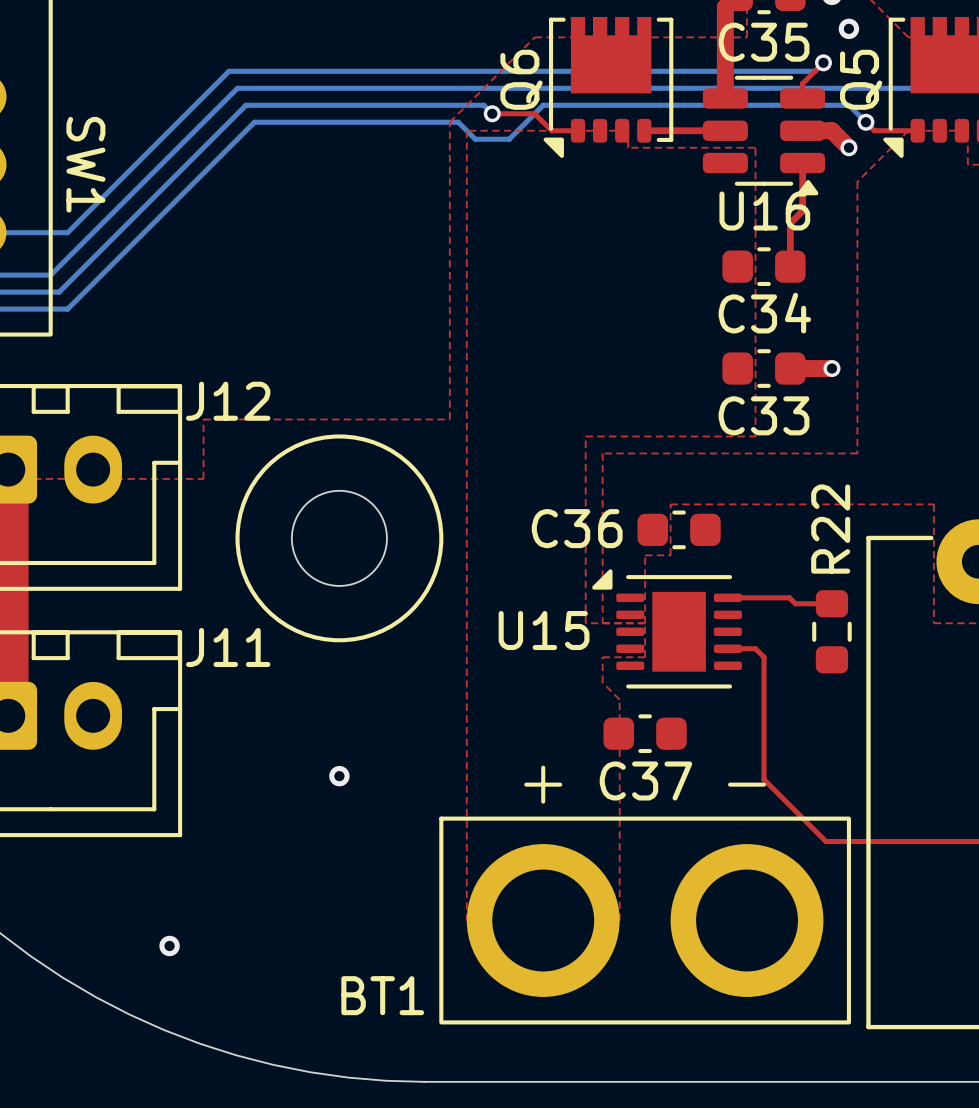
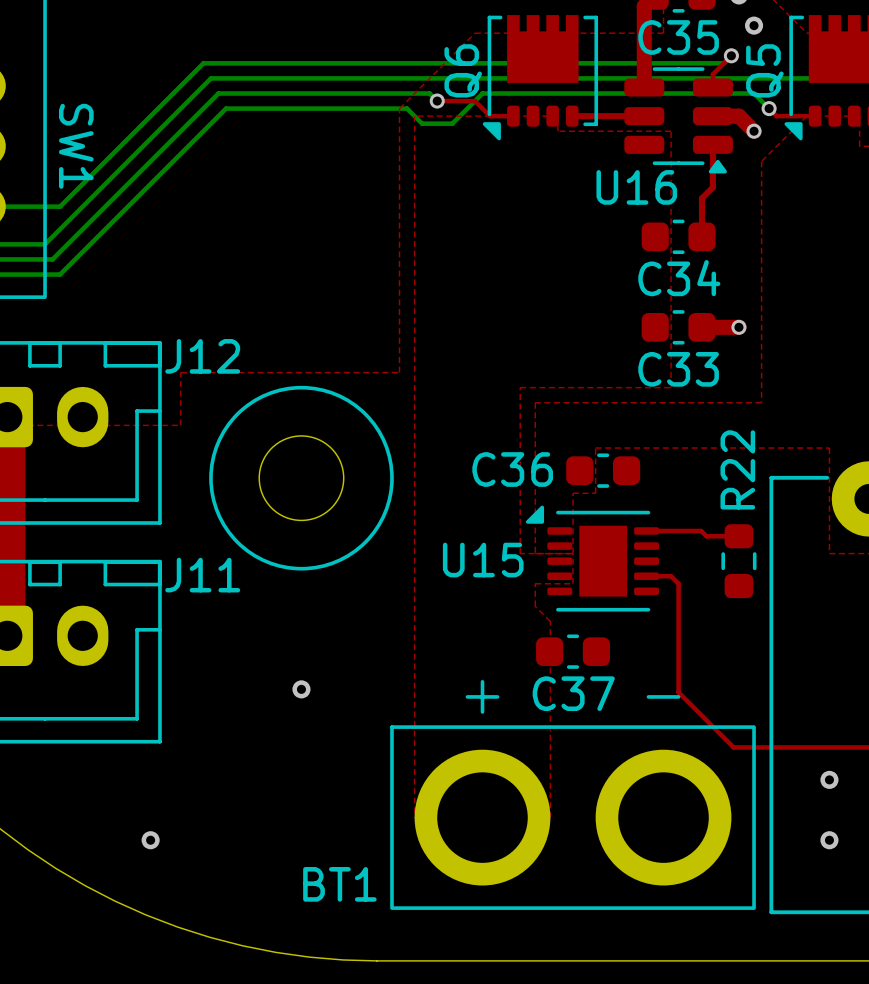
U16 name position: U16 (764, 211) -> U16 (636, 187)
via: none -> (829, 779)
via: none -> (829, 840)

